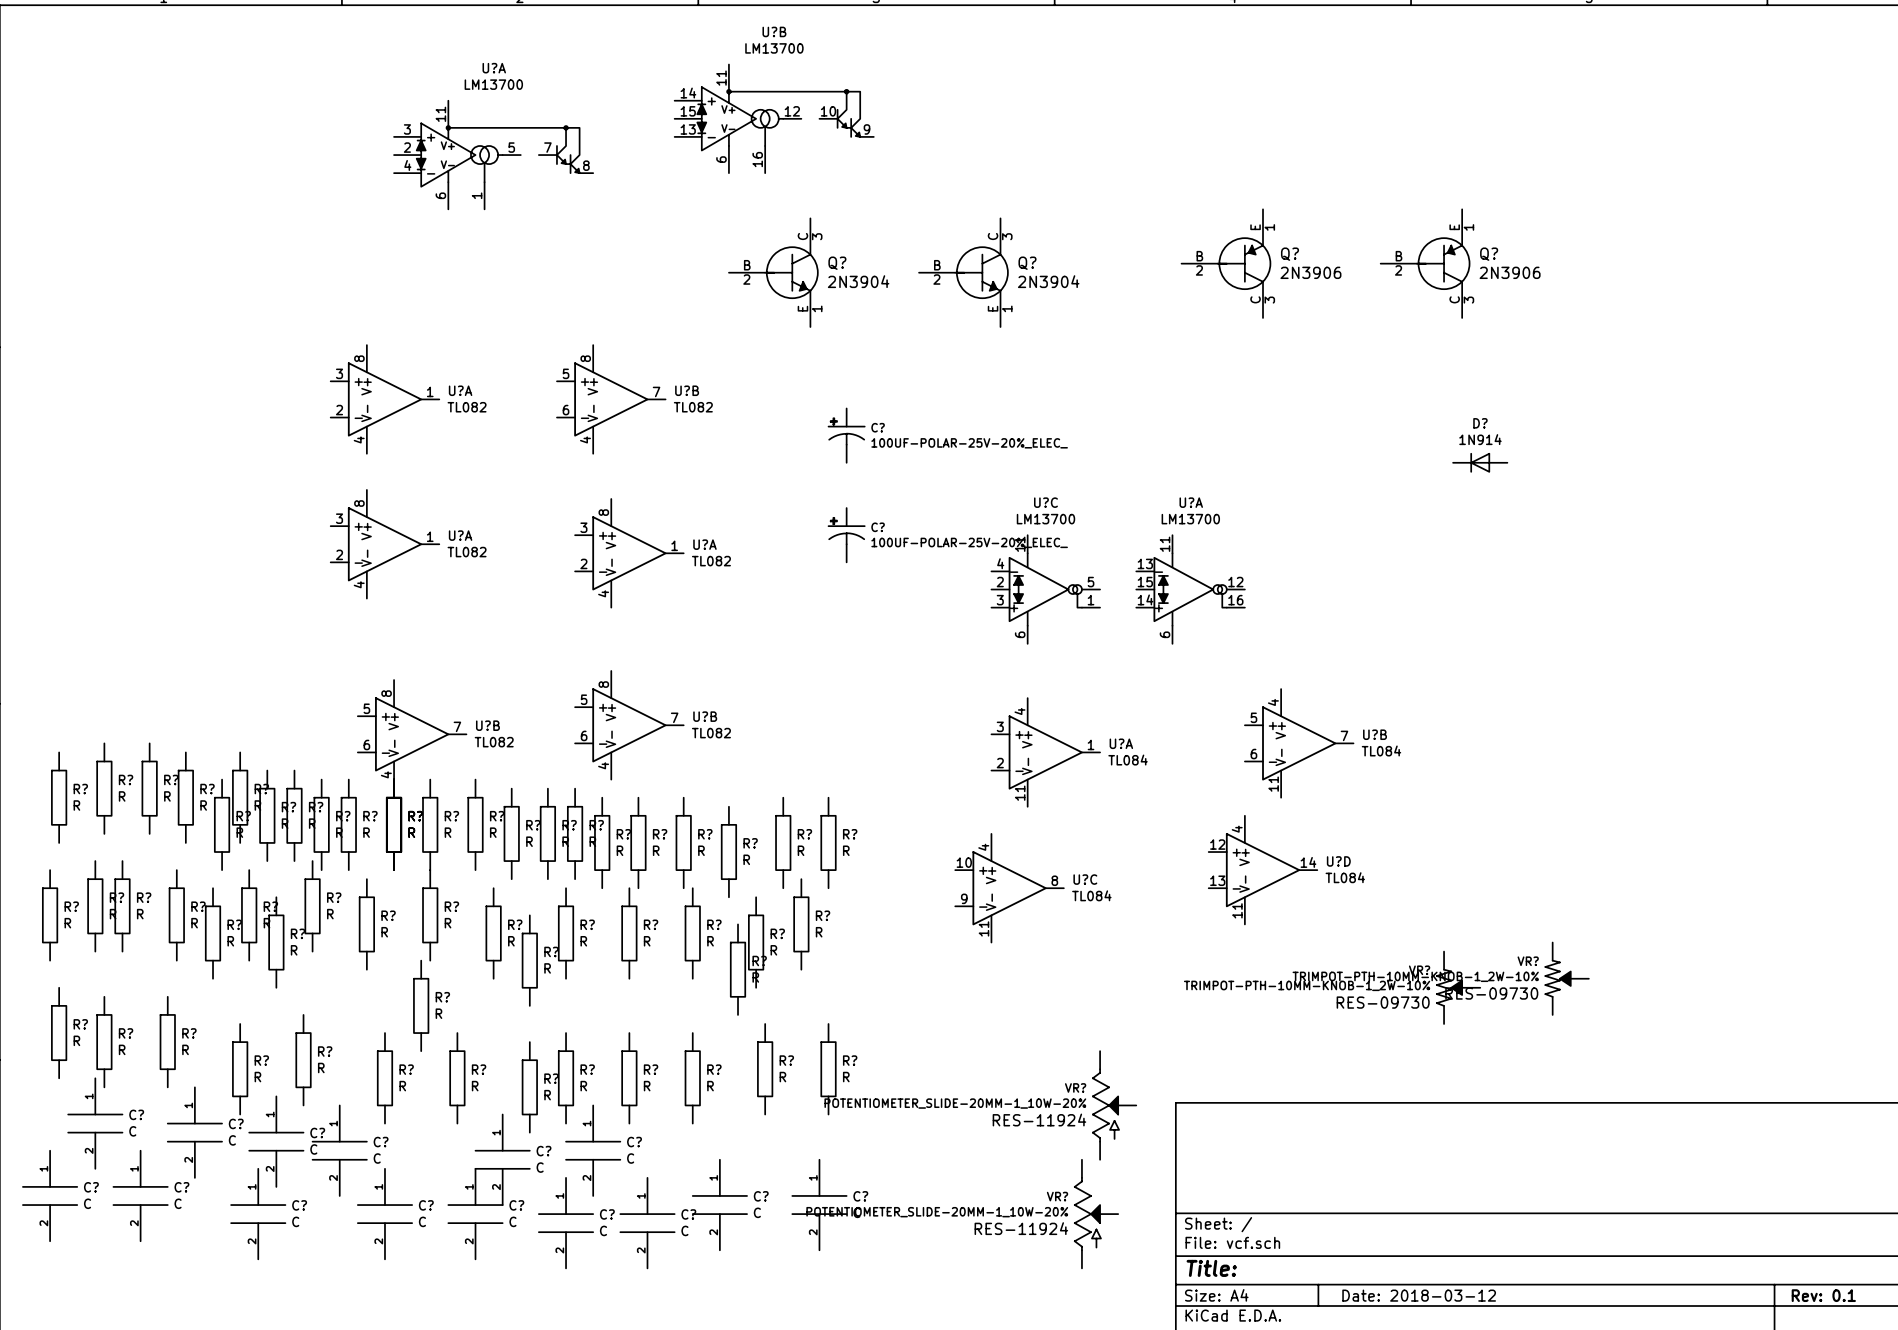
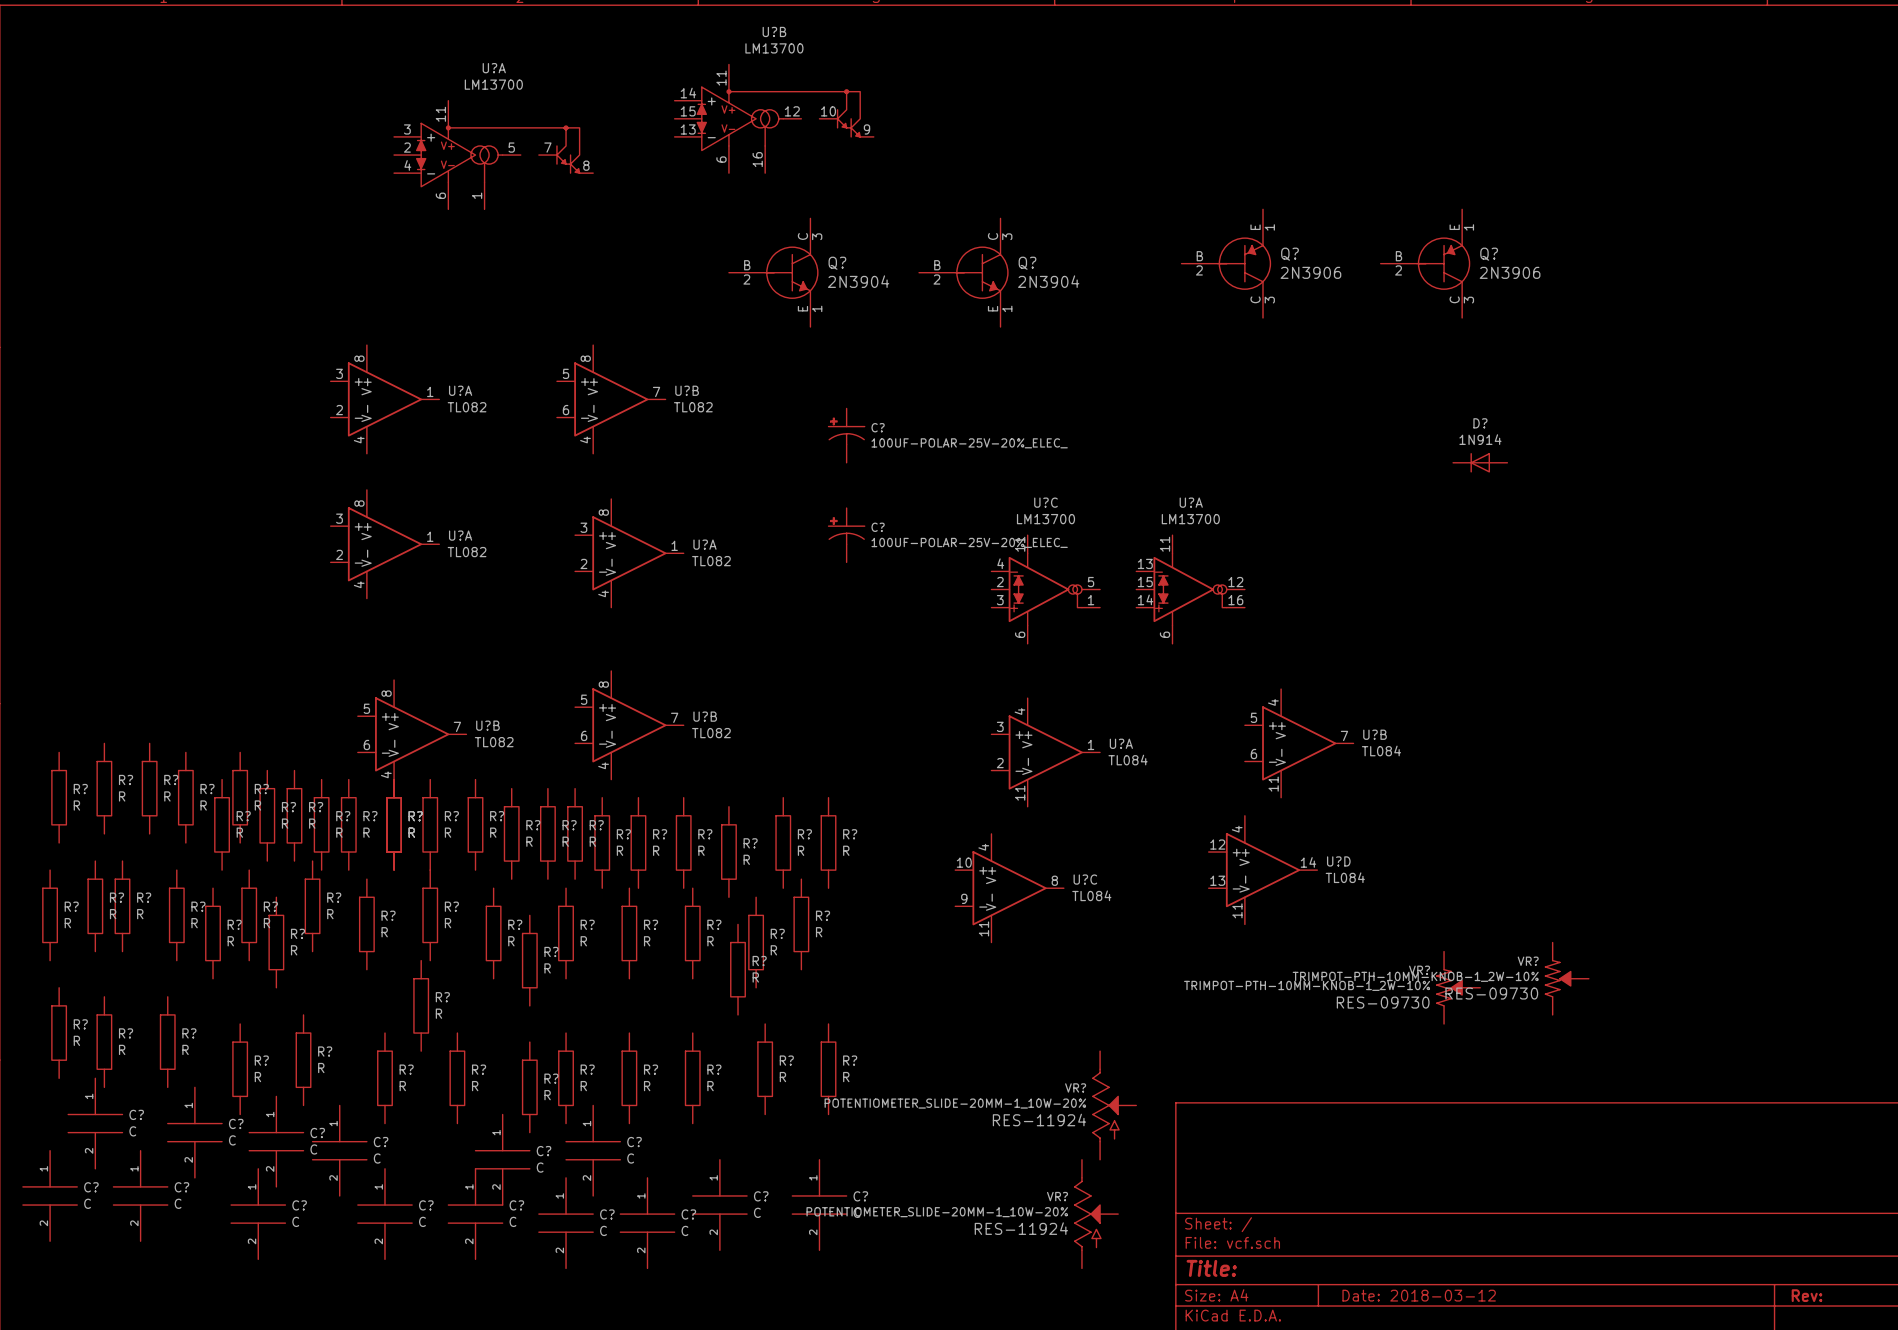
title block: Rev: 0.1 (1823, 1295) -> Rev: (1807, 1295)

